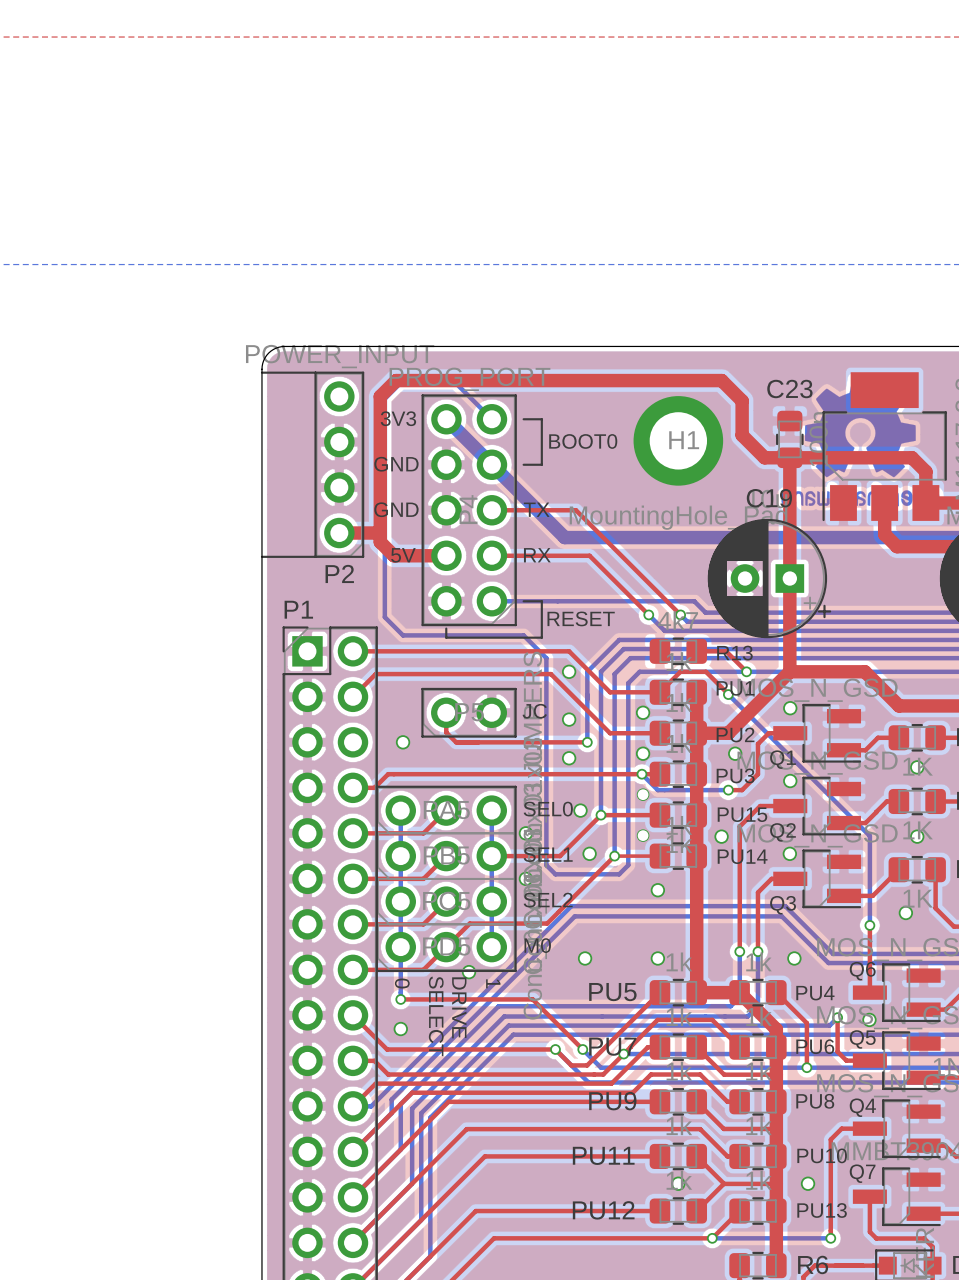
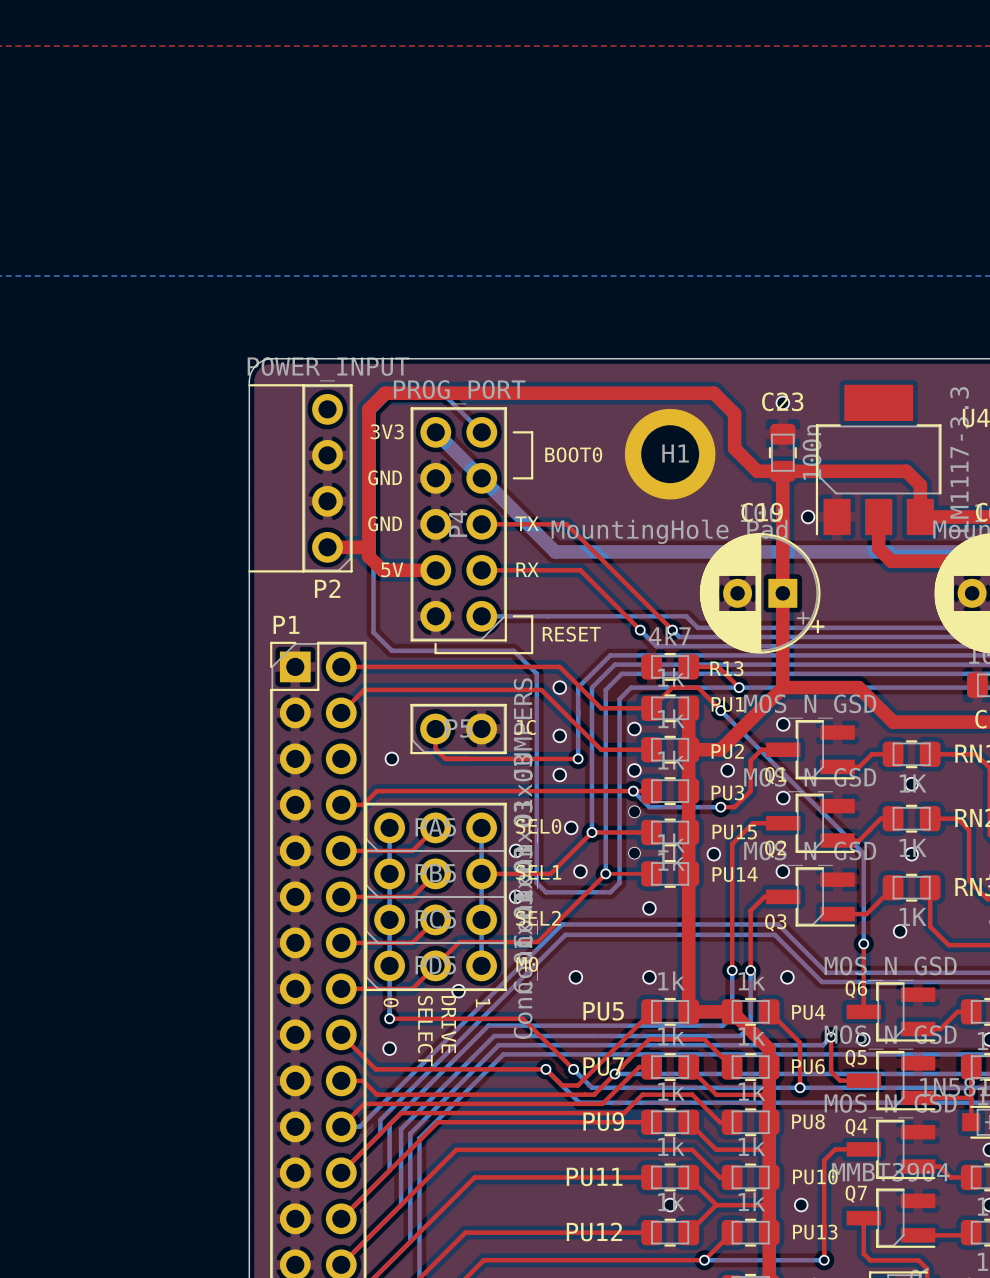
drawing: [781, 377, 940, 512] -> none
via: none -> (782, 402)
via: none -> (808, 516)

